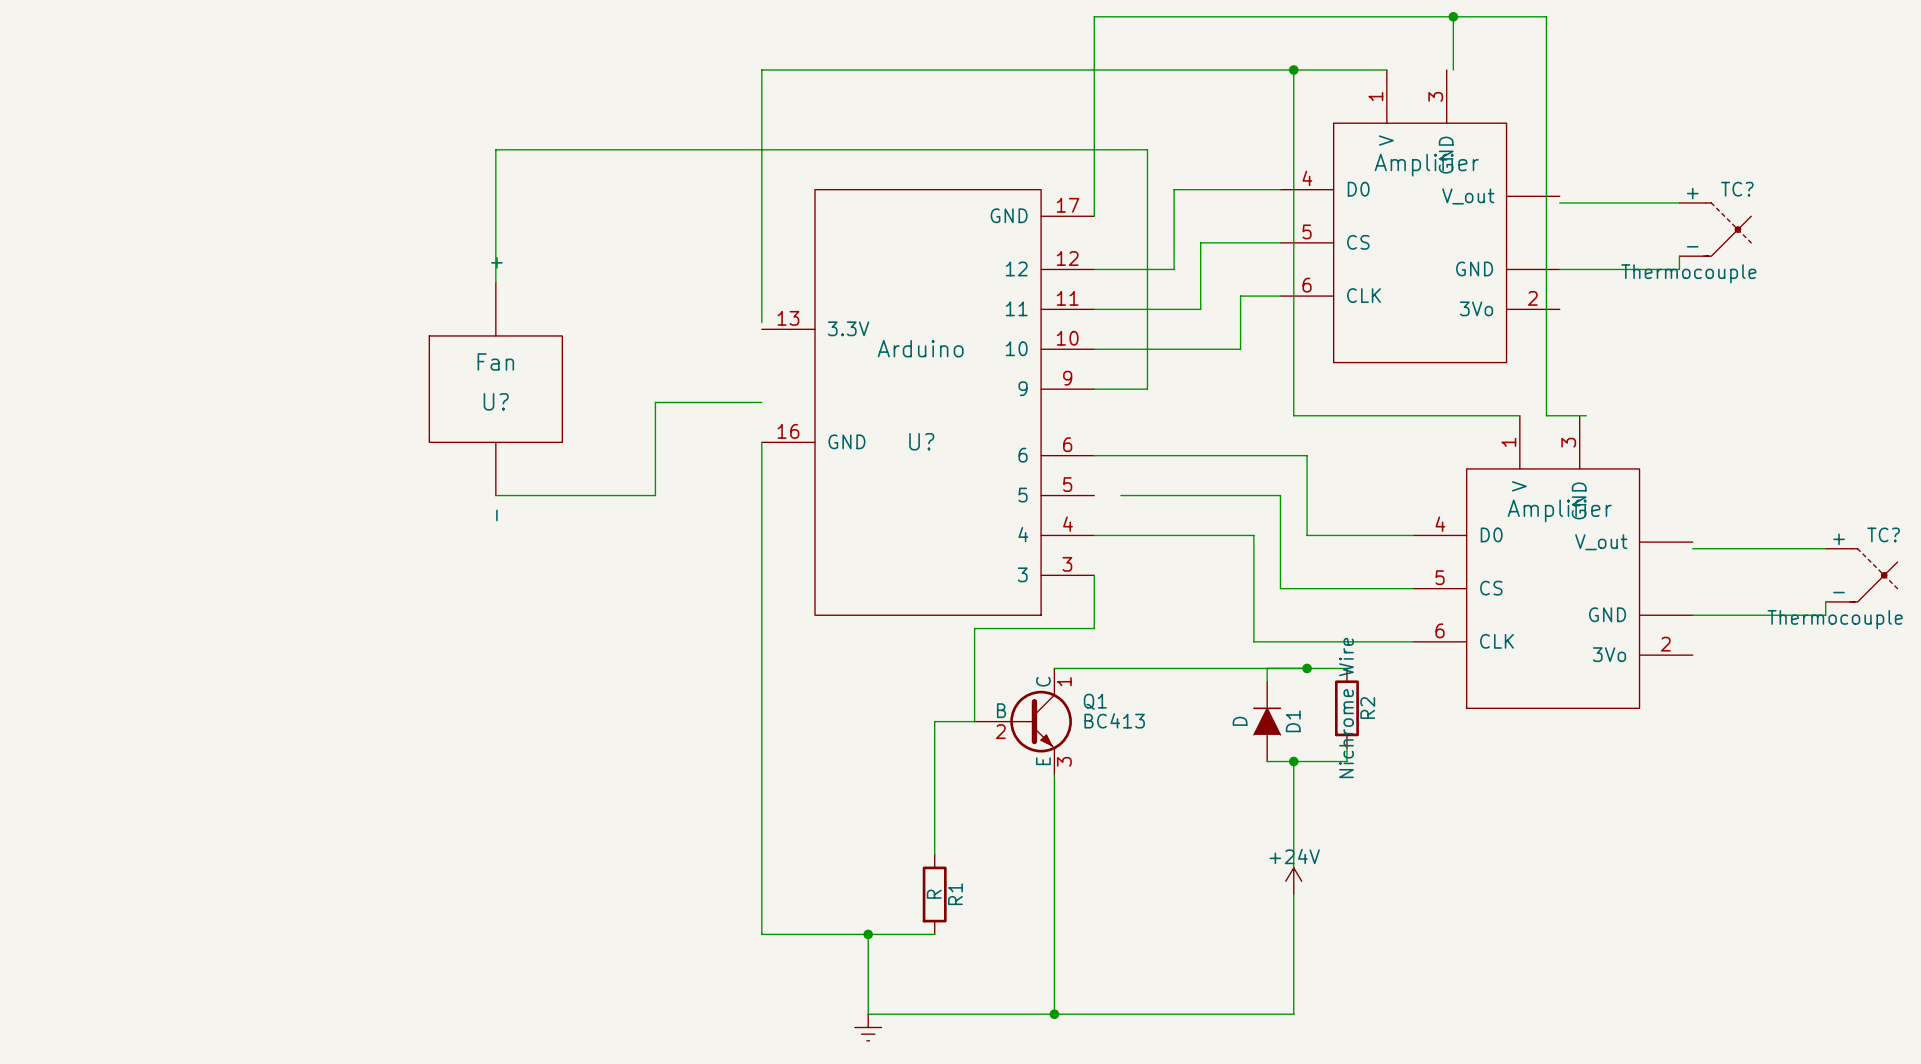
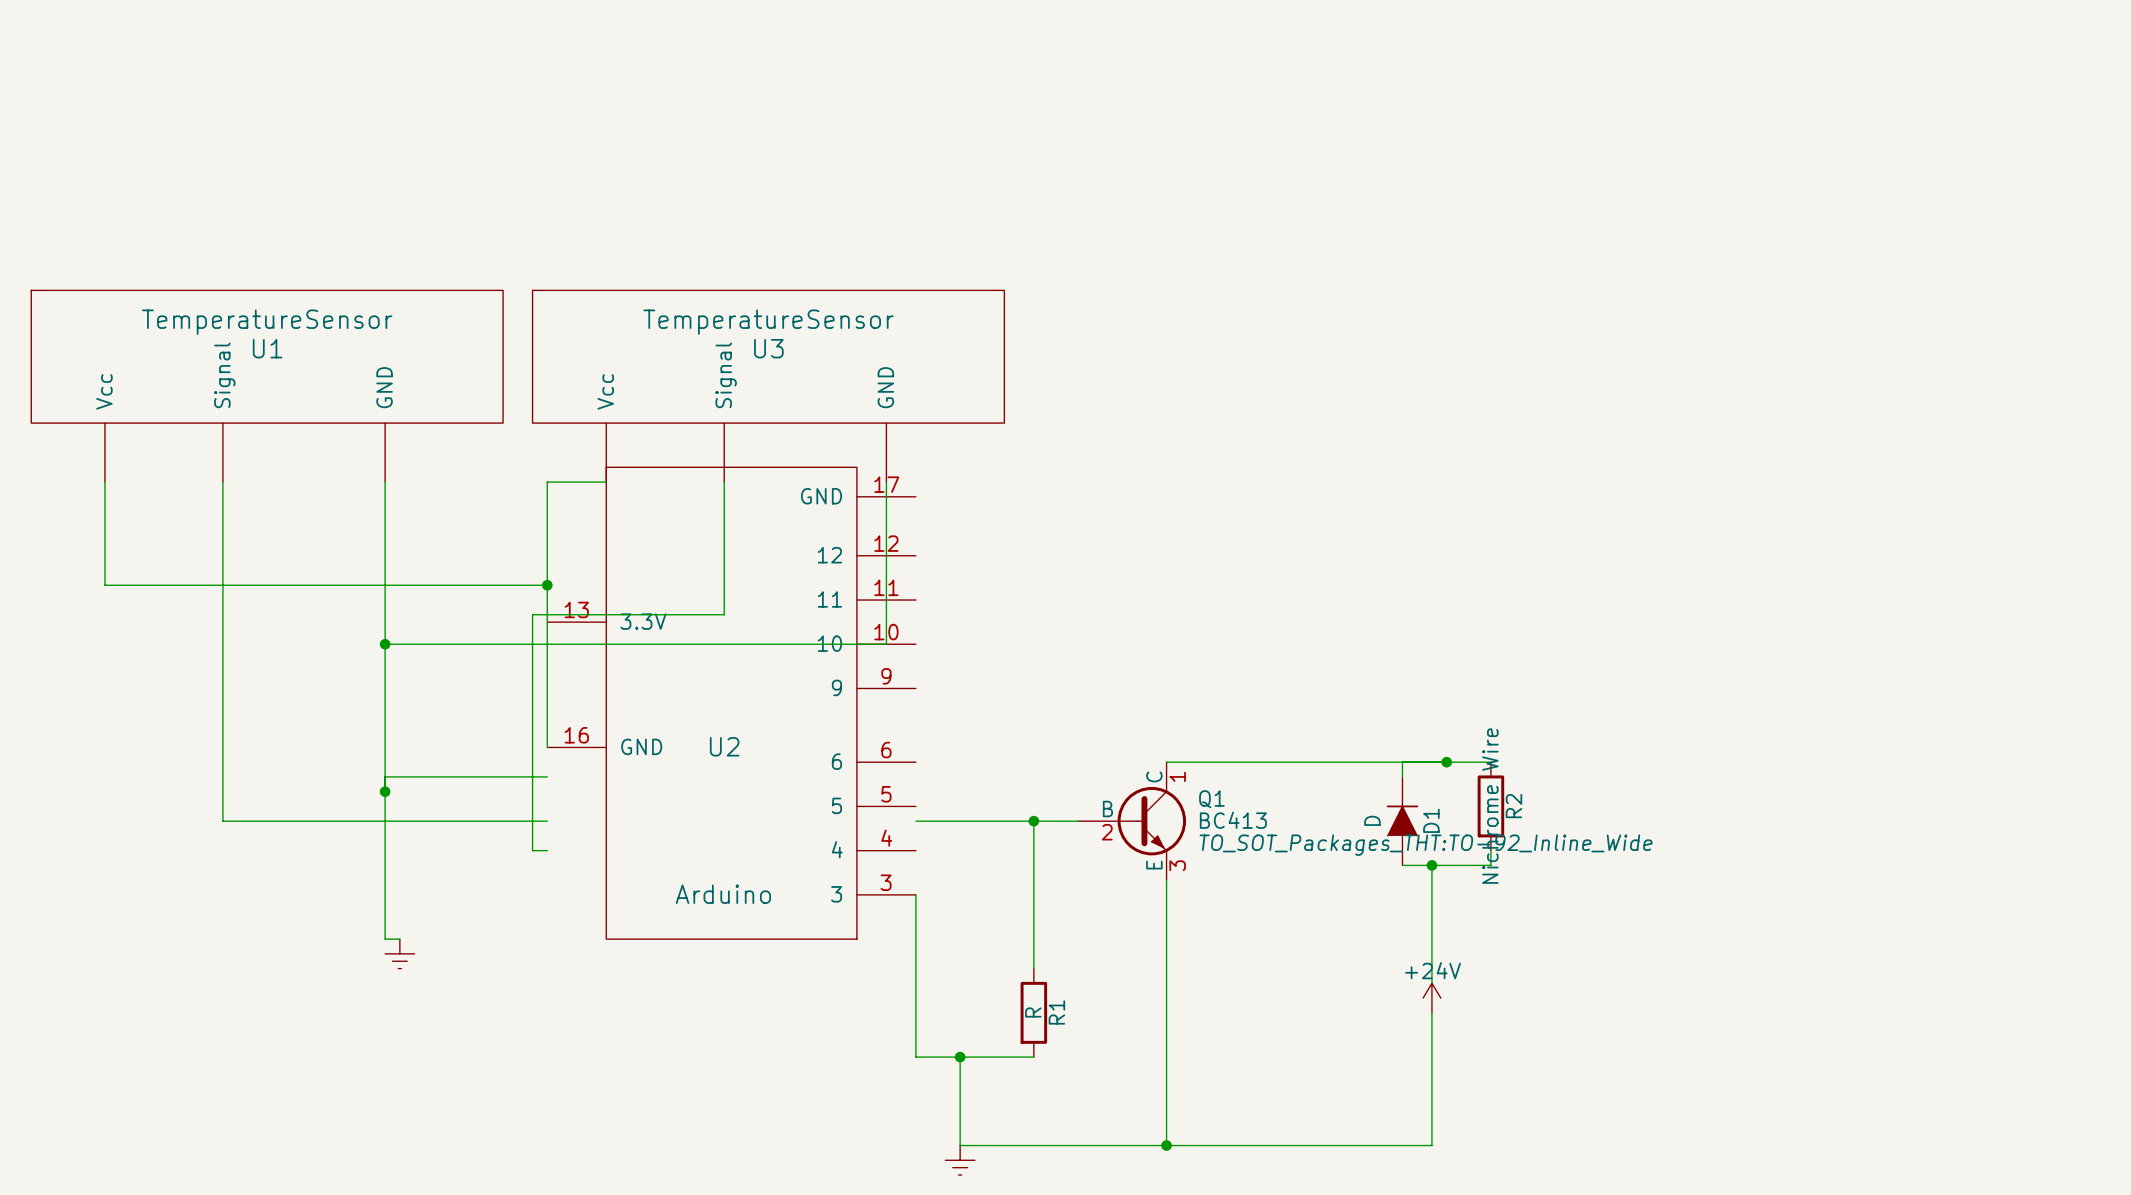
wire: (1453, 16) (1453, 69) -> none
junction: (1453, 16) -> none
wire: (1293, 69) (1293, 415) (1519, 415) -> none
junction: (1293, 69) -> none
wire: (1386, 69) (761, 69) (761, 322) -> none
wire: (1280, 189) (1174, 189) (1174, 269) (1094, 269) -> none
wire: (1559, 202) (1679, 202) -> none
wire: (1094, 216) (1094, 16) (1546, 16) (1546, 415) (1586, 415) -> none
part: Amplifier (1420, 216) -> none
TC?: Thermocouple (1715, 229) -> none
wire: (1280, 242) (1200, 242) (1200, 309) (1094, 309) -> none
wire: (1679, 256) (1679, 269) (1559, 269) -> none
wire: (495, 282) (495, 149) (1147, 149) (1147, 389) (1094, 389) -> none
wire: (1280, 296) (1240, 296) (1240, 349) (1094, 349) -> none
U1: none -> TemperatureSensor (267, 386)
U3: none -> TemperatureSensor (768, 386)
U?: Fan (495, 389) -> none
U?: Arduino (928, 402) -> none
wire: none -> (104, 482) (104, 585) (547, 585)
wire: none -> (222, 482) (222, 821) (547, 821)
wire: none -> (385, 482) (385, 939) (399, 939)
wire: none -> (606, 482) (547, 482) (547, 747)
wire: none -> (886, 482) (886, 644) (385, 644)
wire: (761, 442) (761, 934) (828, 934) -> (915, 894) (915, 1057)
wire: (1094, 455) (1307, 455) (1307, 535) (1413, 535) -> none
wire: (495, 495) (655, 495) -> (547, 850) (532, 850) (532, 614) (724, 614) (724, 570)
wire: (1120, 495) (1280, 495) (1280, 588) (1413, 588) -> none
junction: none -> (547, 585)
wire: (1094, 535) (1253, 535) (1253, 641) (1413, 641) -> none
wire: (1692, 548) (1825, 548) -> none
junction: none -> (385, 644)
part: Amplifier (1553, 562) -> none
wire: (1094, 575) (1094, 628) (974, 628) (974, 721) -> none
TC?: Thermocouple (1861, 575) -> none
wire: (1825, 601) (1825, 615) (1692, 615) -> none
U2: none -> Arduino (731, 703)
wire: none -> (385, 776) (547, 776)
junction: none -> (385, 791)
wire: none -> (915, 821) (1033, 821)
junction: none -> (1033, 821)
Q1 text: none -> TO_SOT_Packages_THT:TO-92_Inline_Wide (1426, 845)
power symbol: none -> (399, 953)

